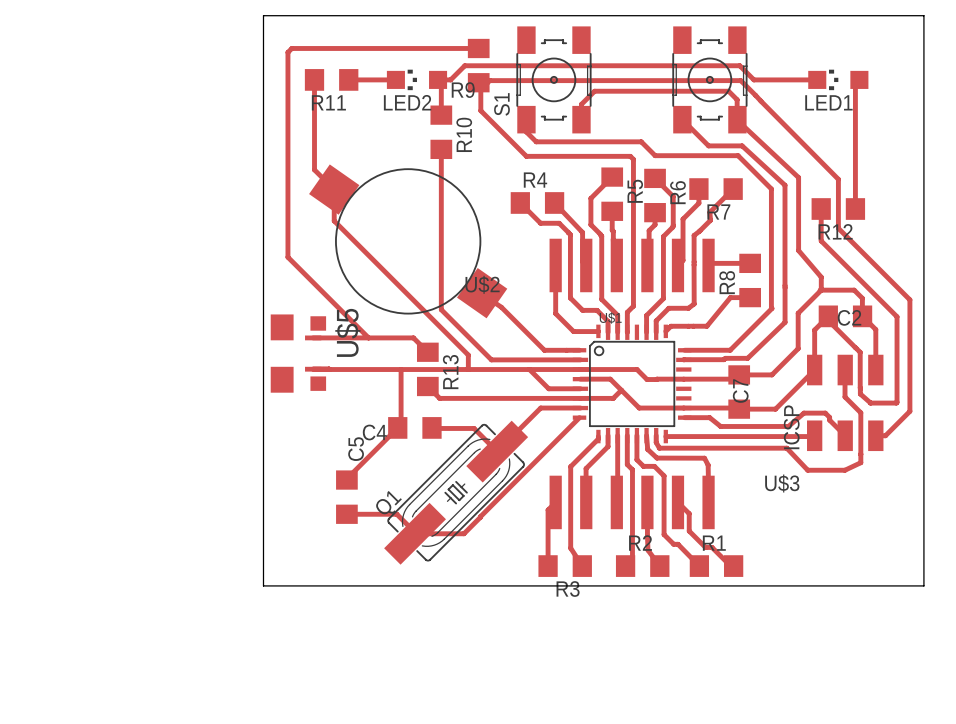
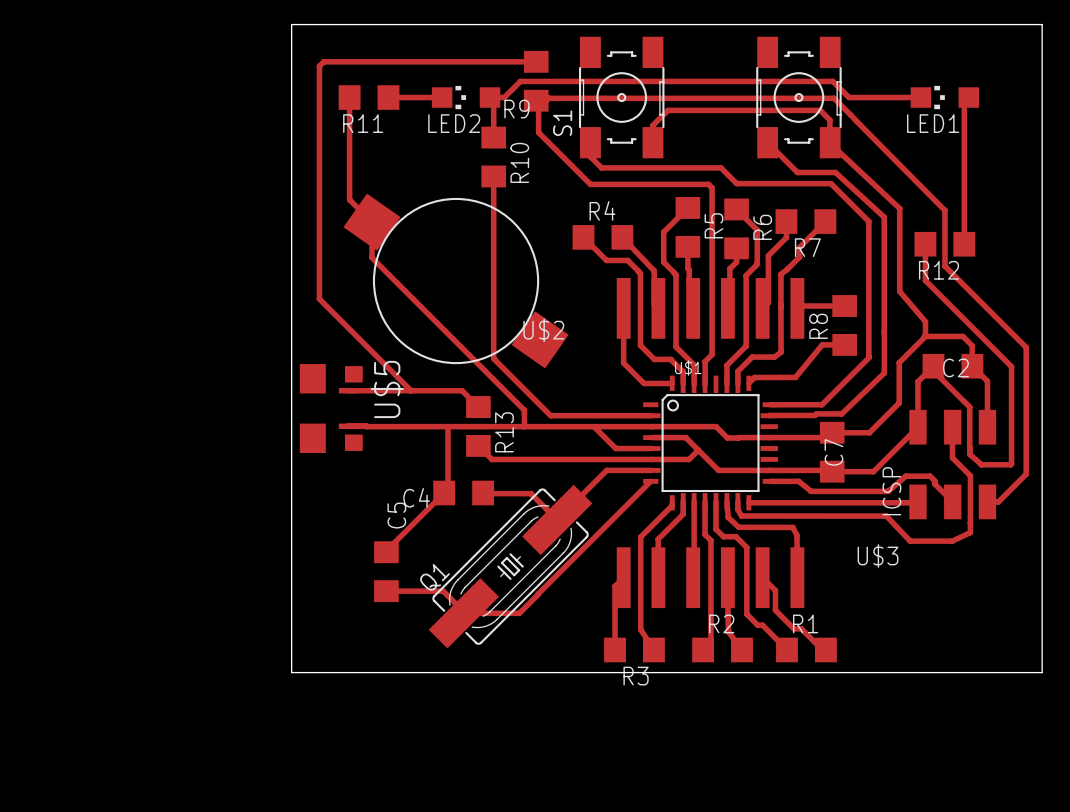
track: (482, 293) (501, 307) (544, 350) (579, 350) -> none

